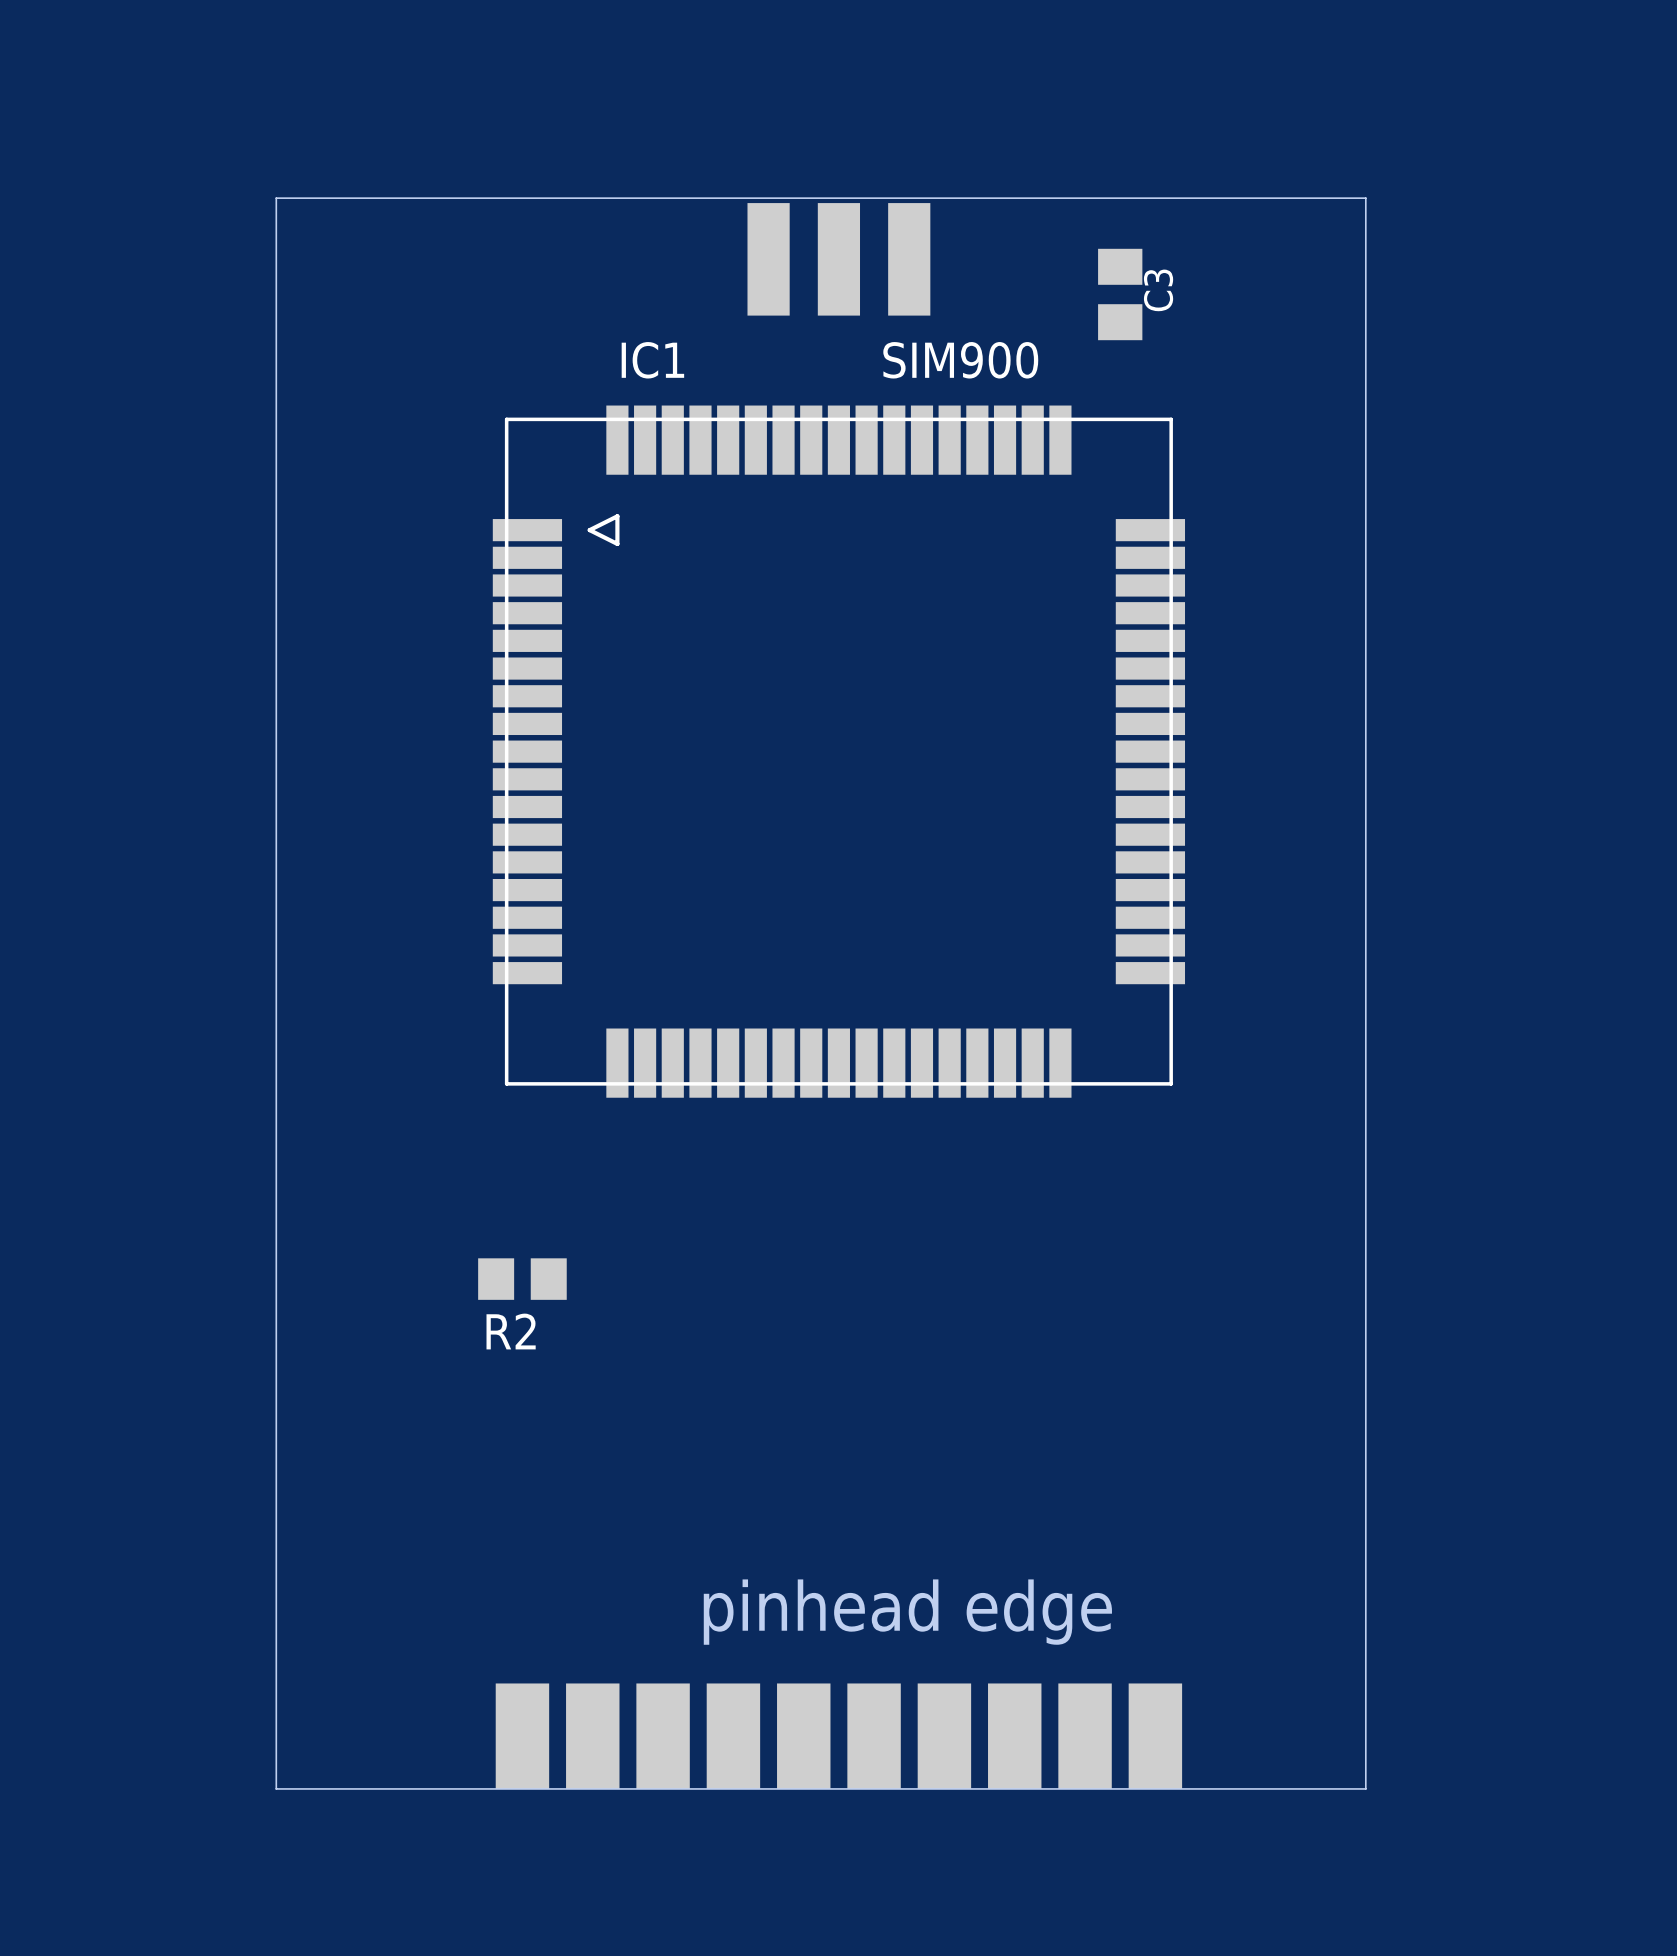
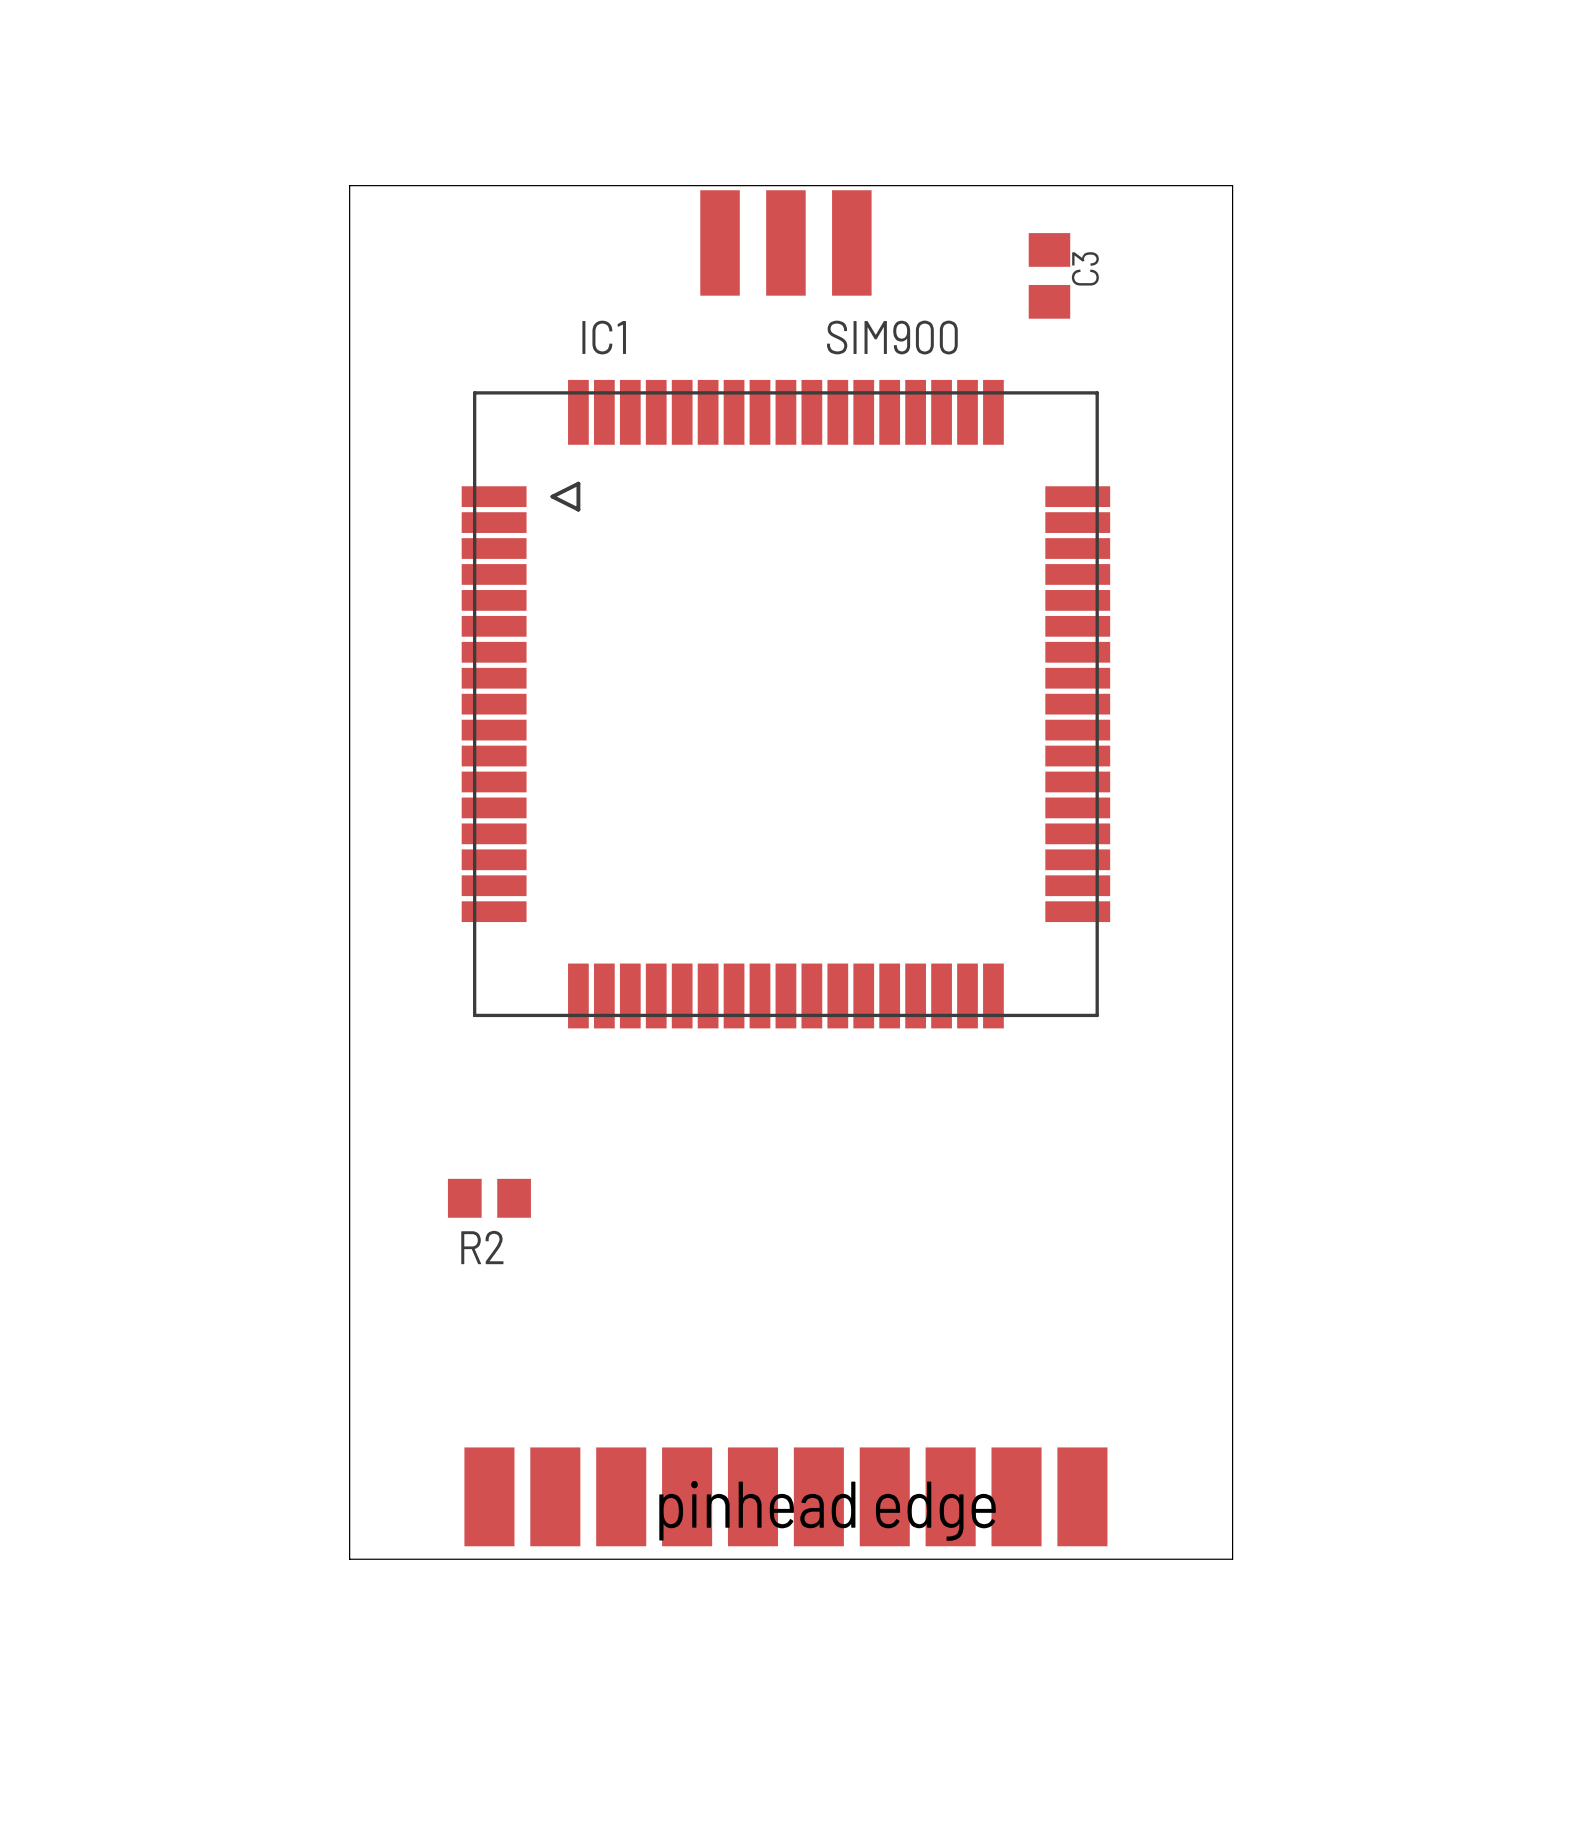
board edge: (373, 198) (276, 198) (276, 1788) (1365, 1788) (1365, 198) (1315, 198) -> (349, 185) (349, 1559) (1232, 1559) (1232, 185)
part position: (838, 1736) -> (785, 1496)

